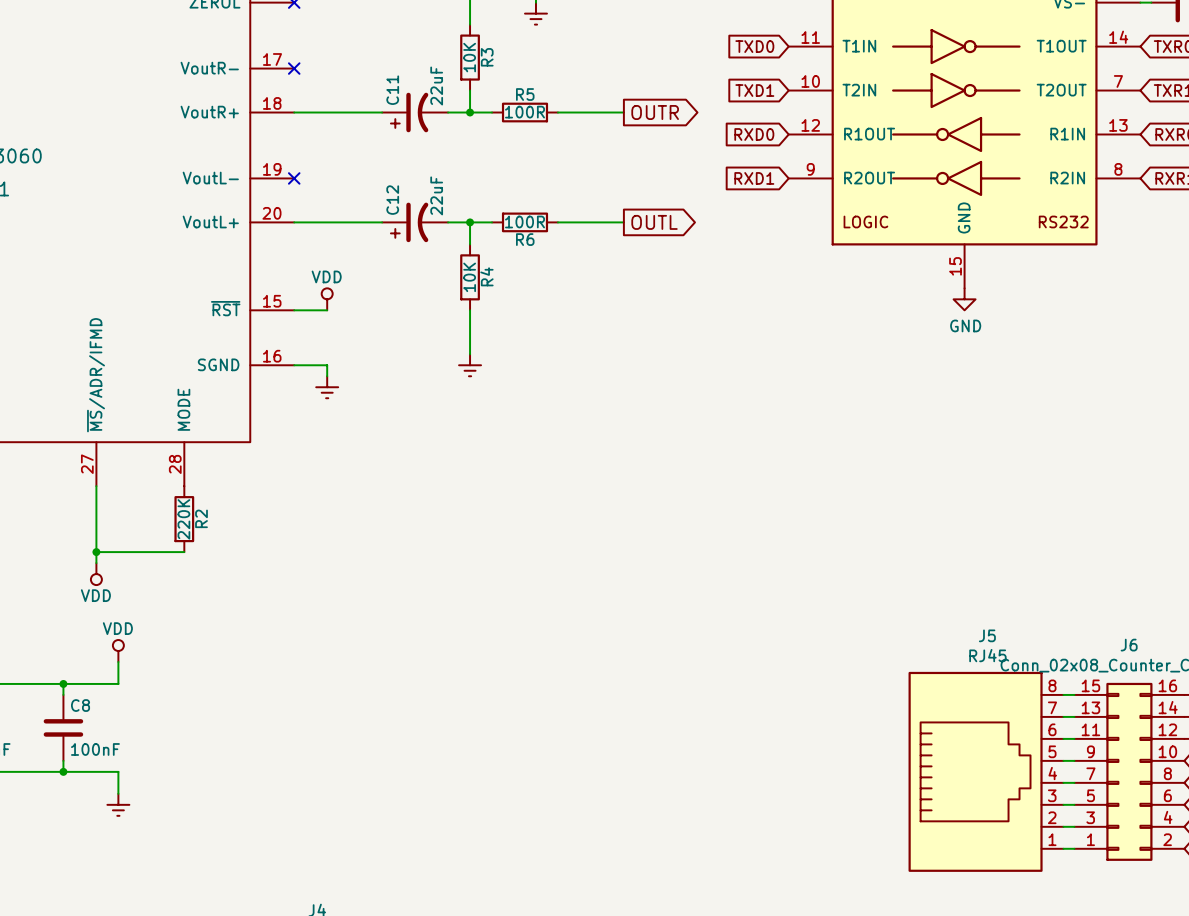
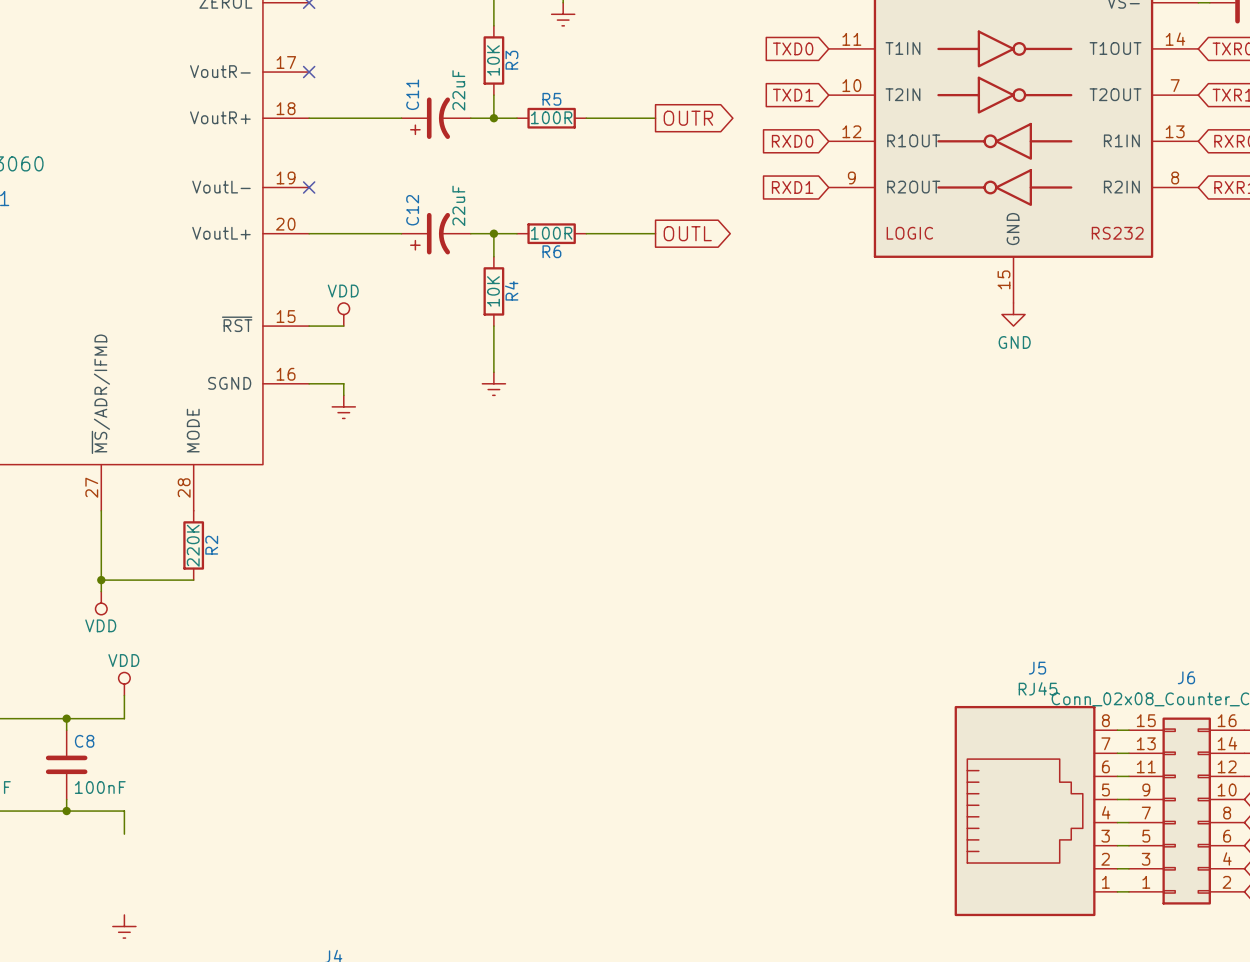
power symbol position: (118, 804) -> (124, 926)

